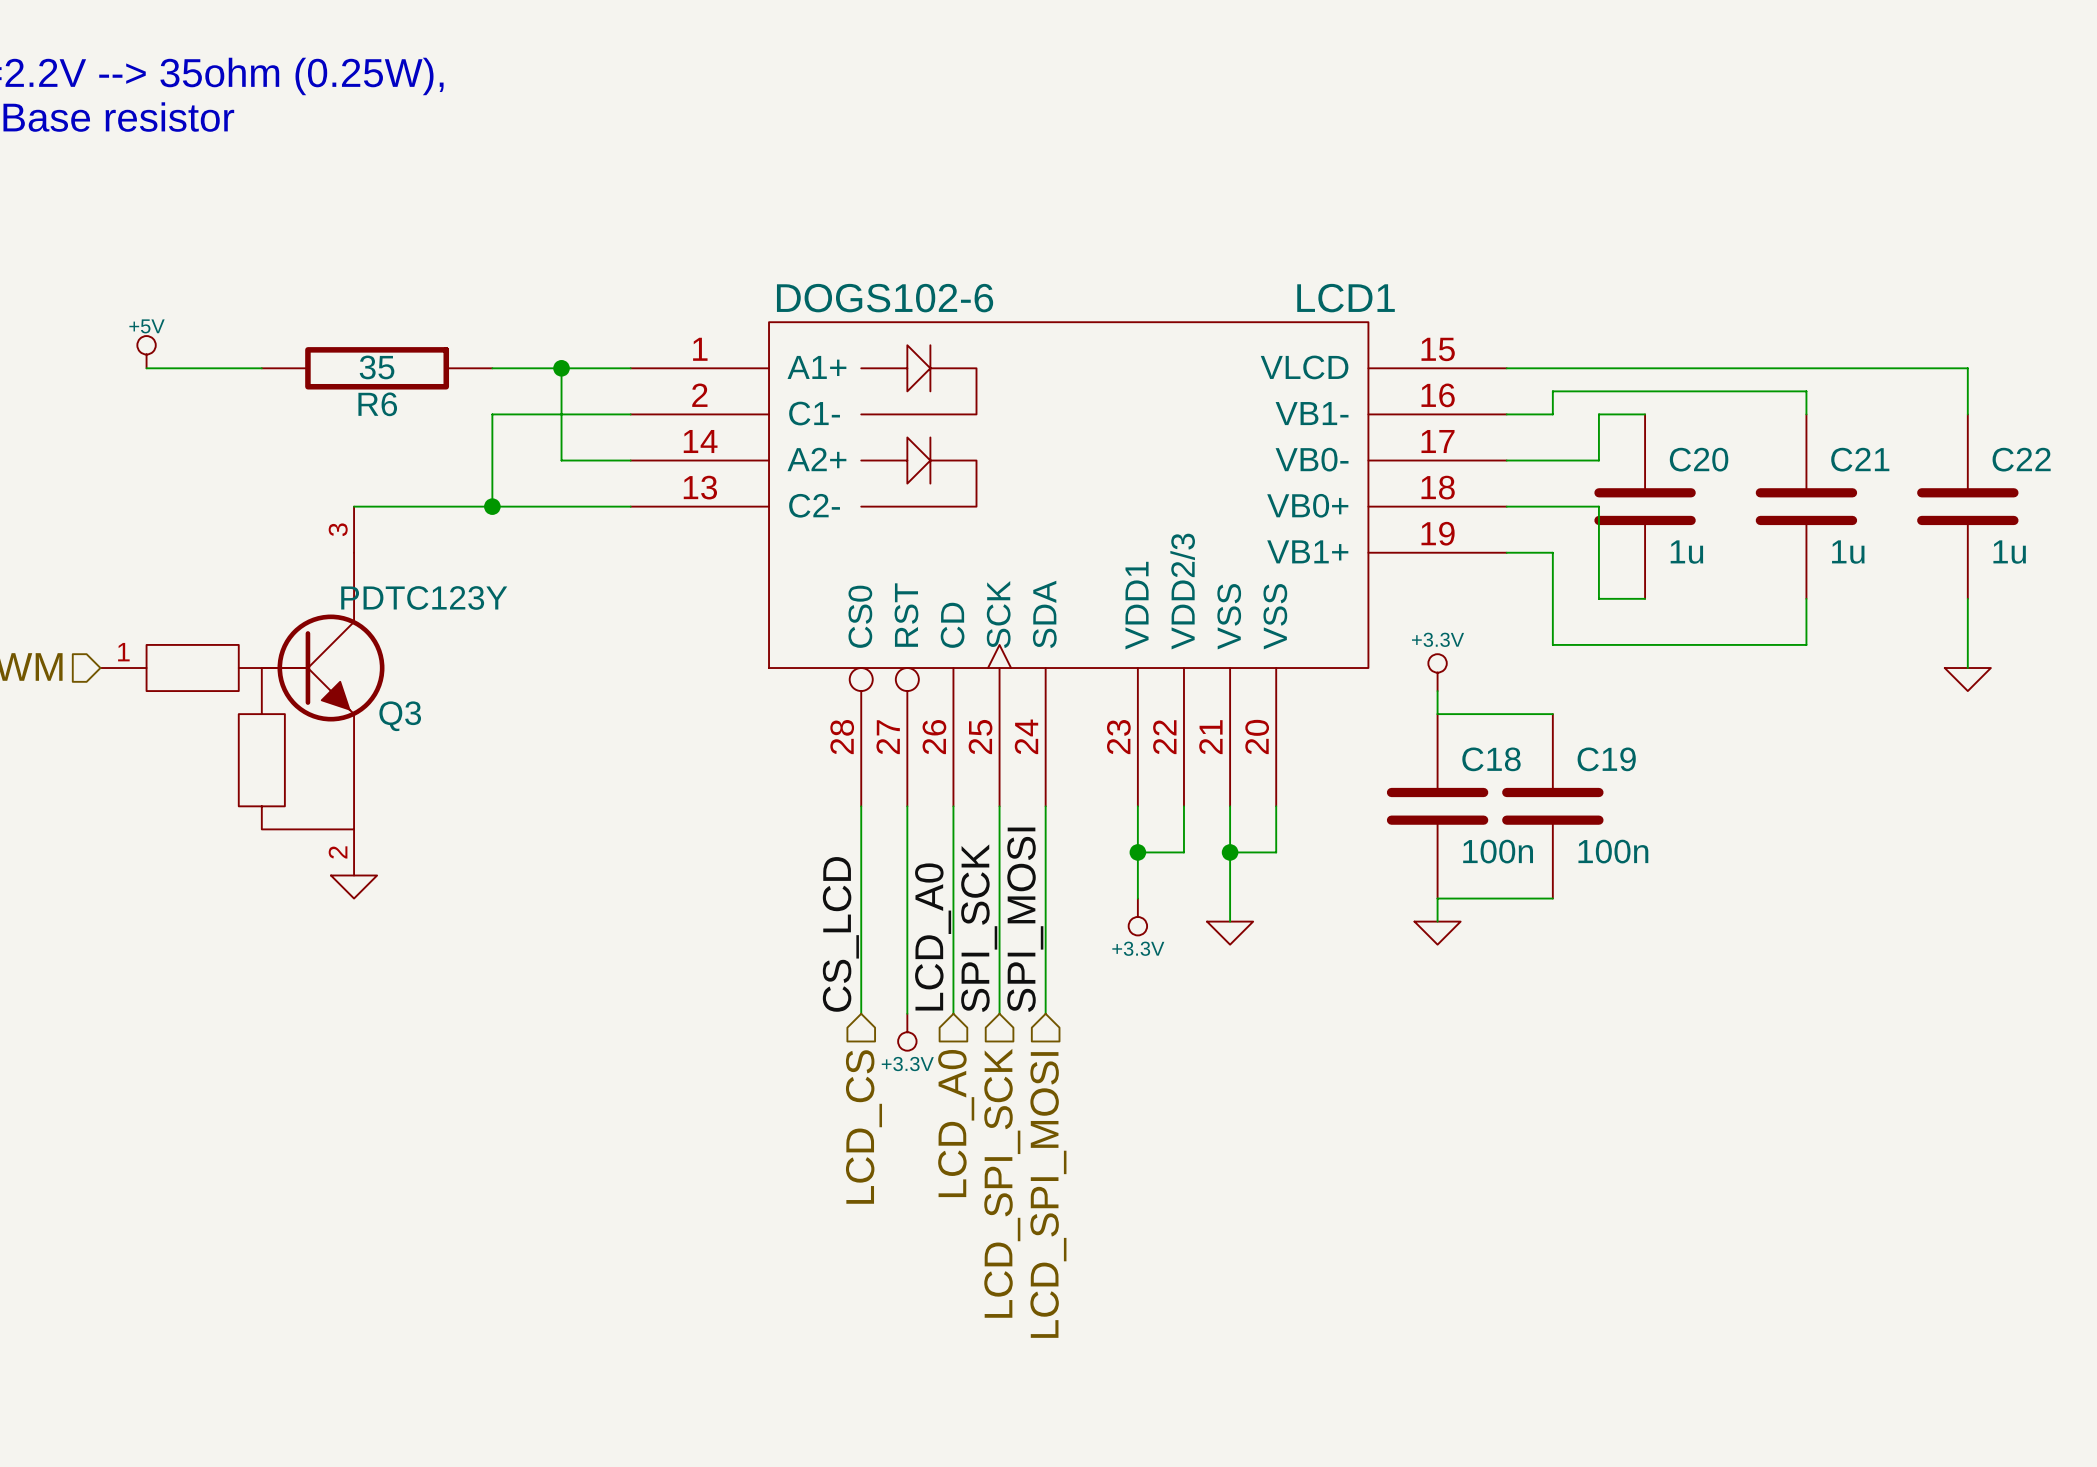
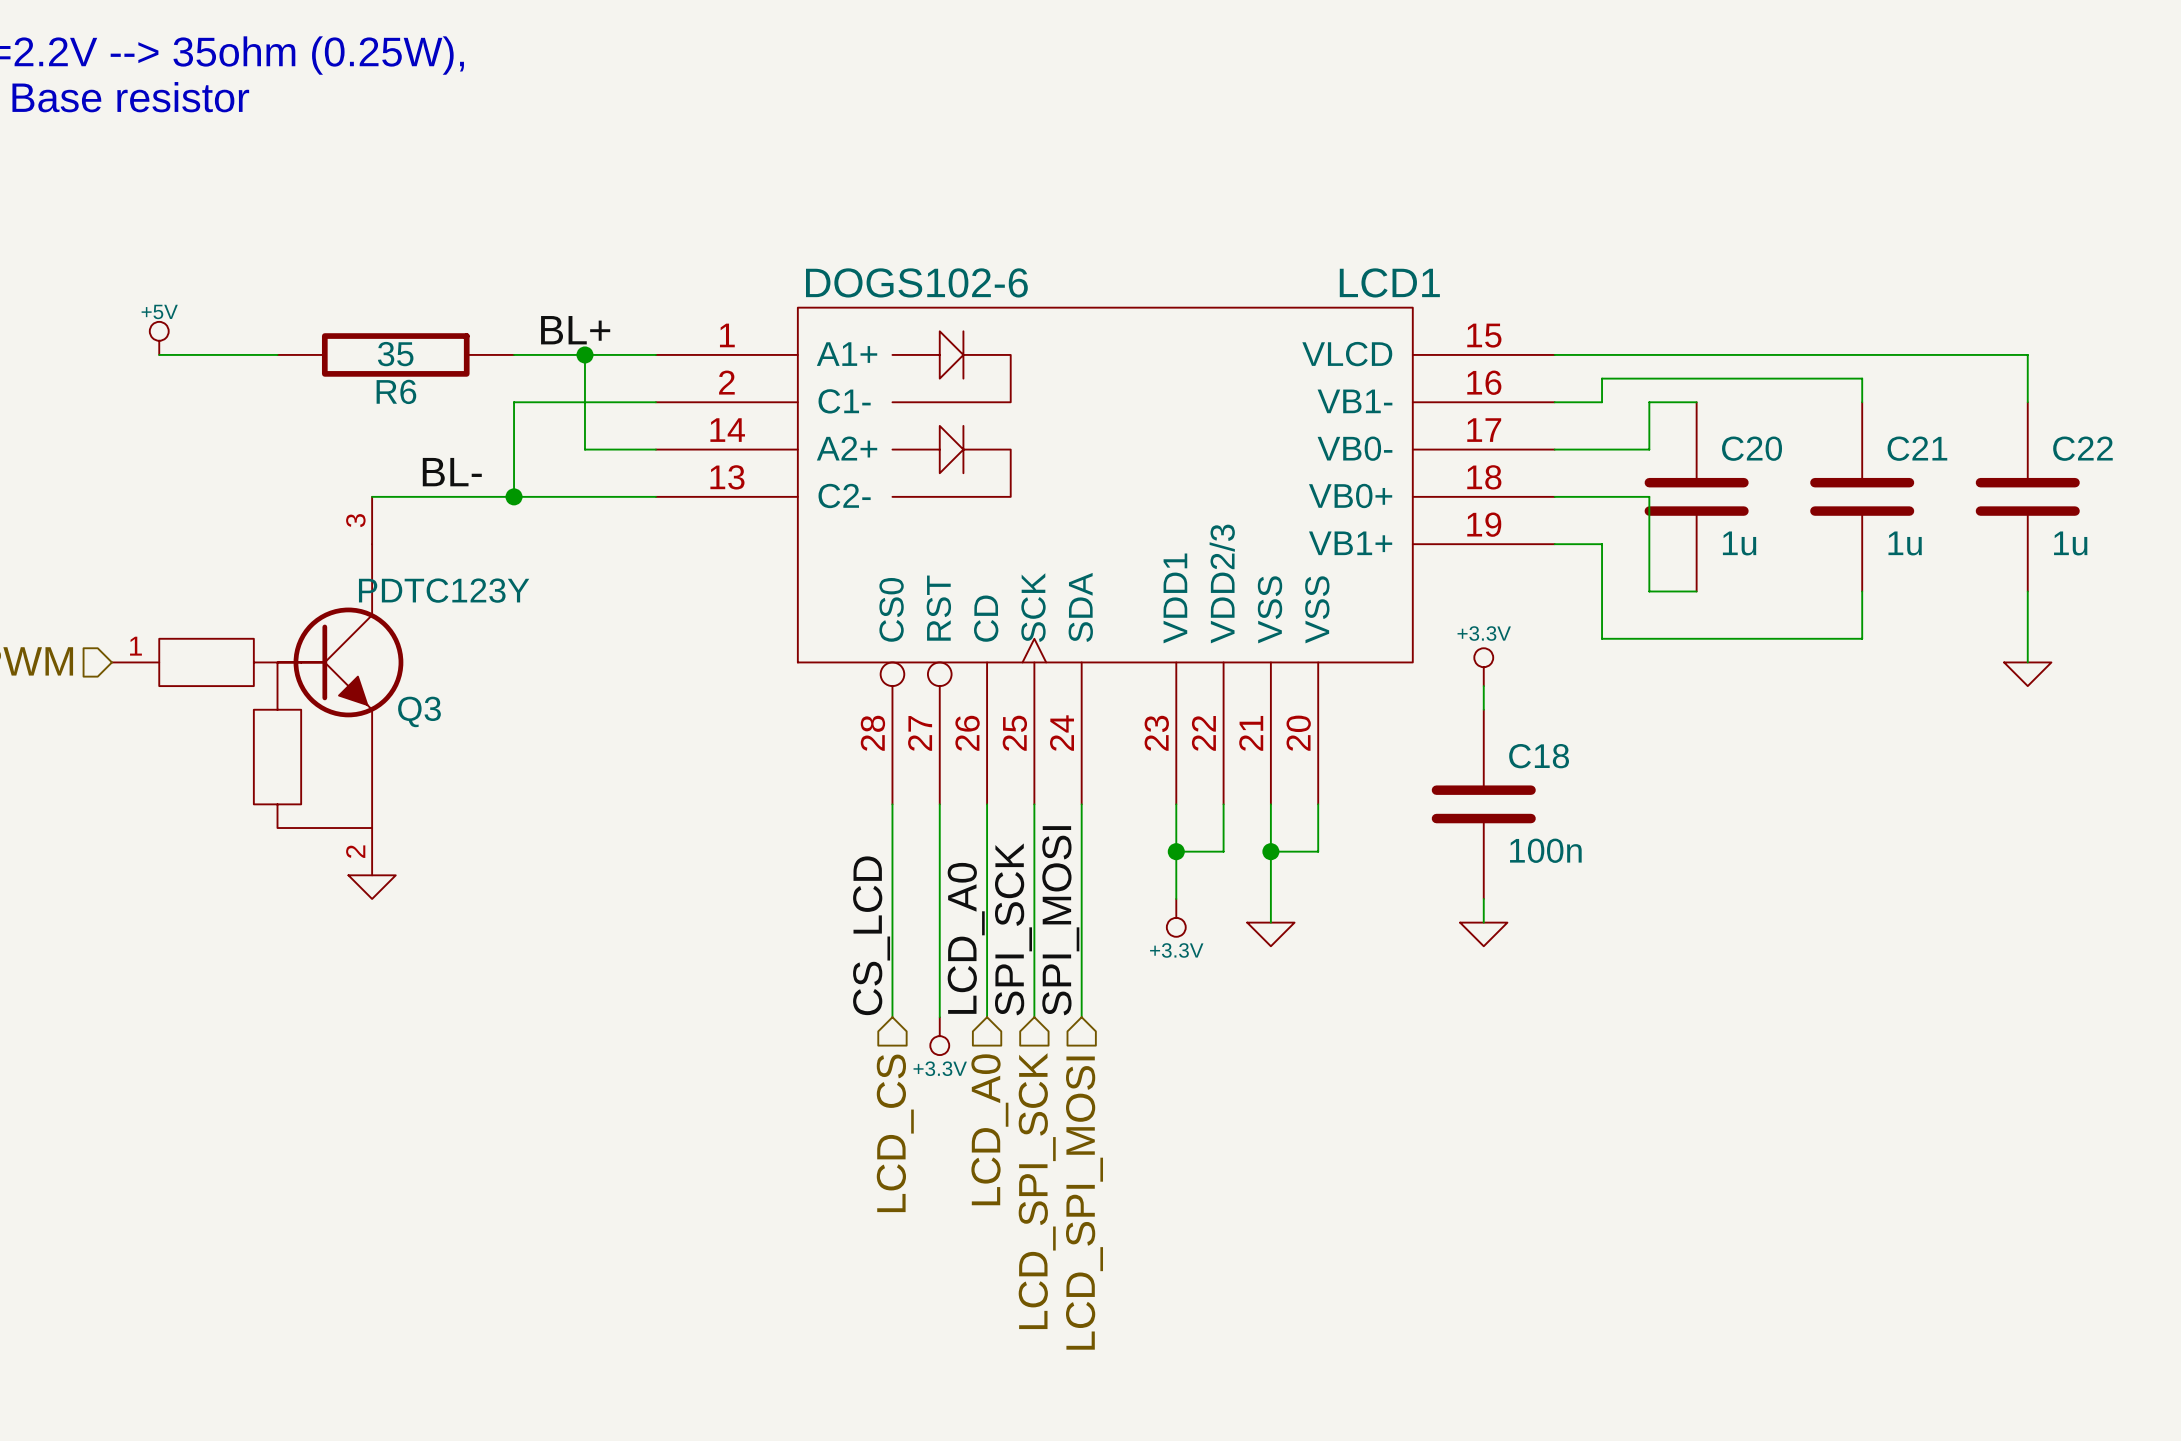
label: none -> BL+ (575, 330)
label: none -> BL- (452, 472)
wire: (1437, 714) (1552, 714) -> none
C19: 100n (1552, 806) -> none
wire: (1437, 898) (1552, 898) -> none

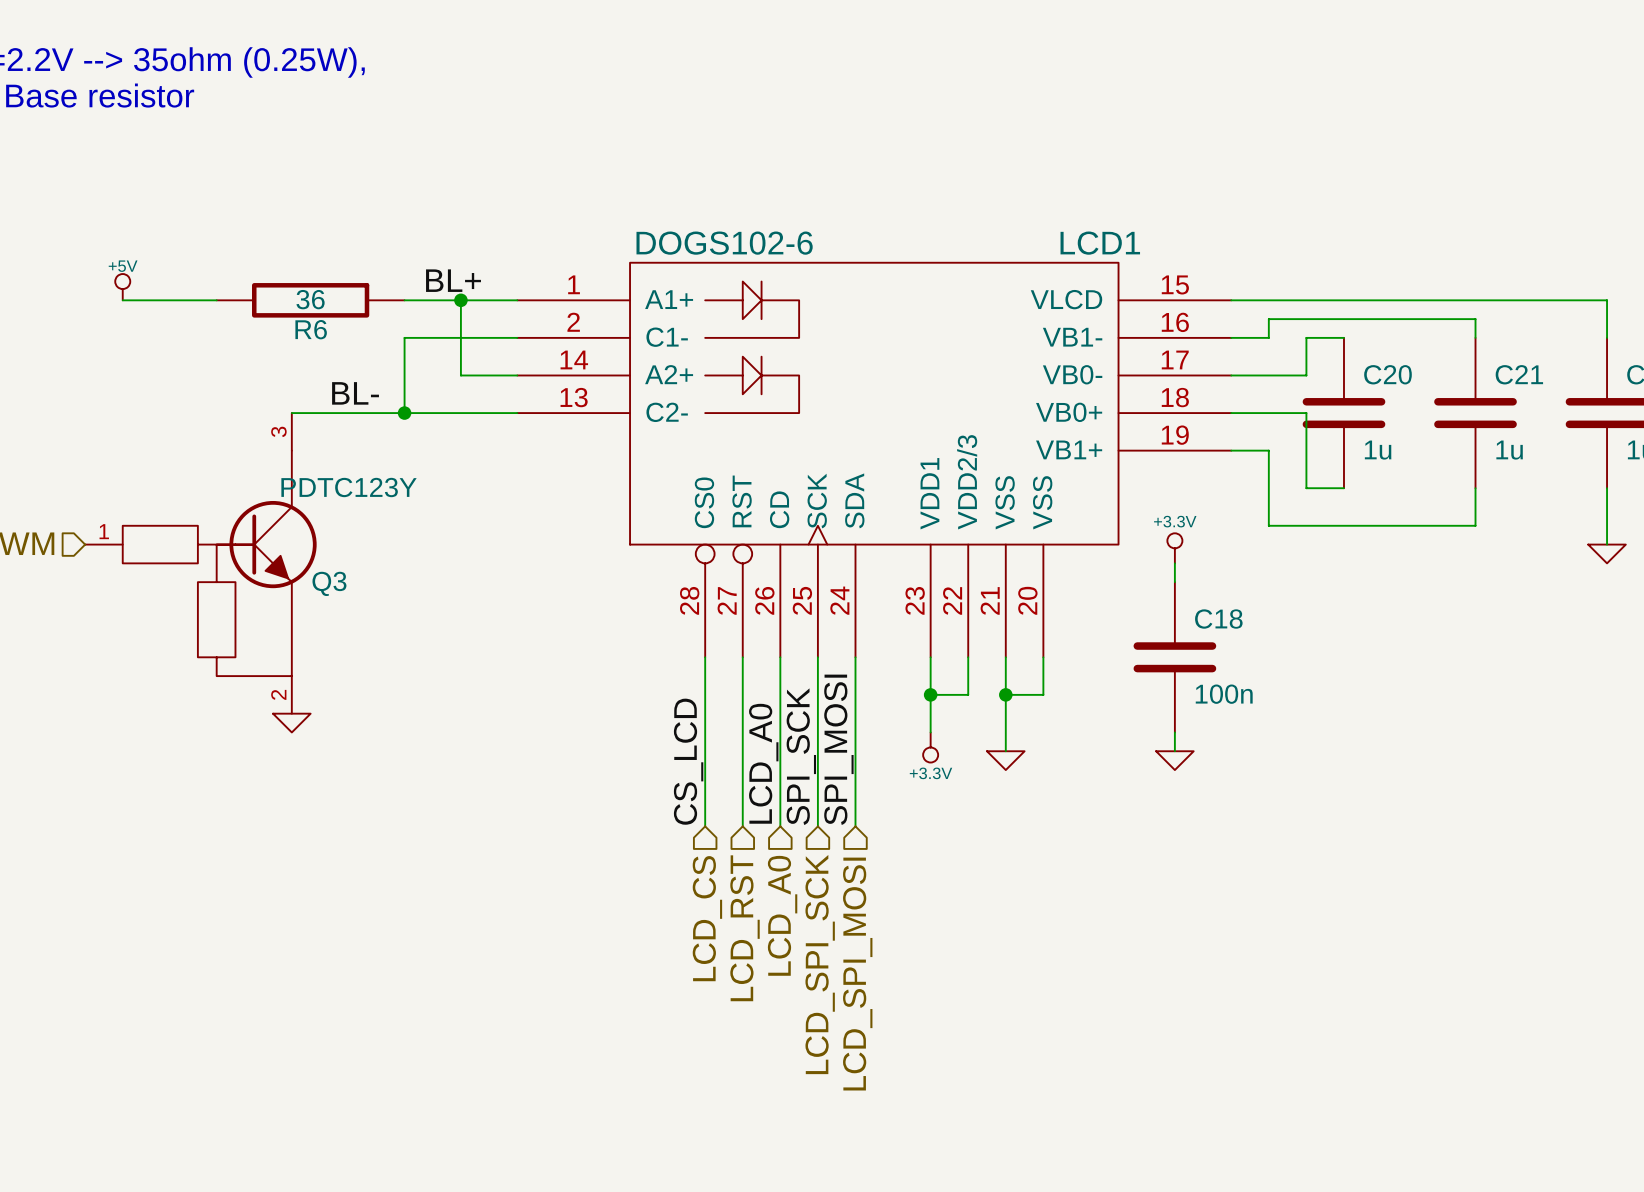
R6 value: 35 (395, 354) -> 36 (310, 299)
power symbol: +3.3V (939, 1036) -> none
hierarchical label: none -> LCD_RST (745, 928)

